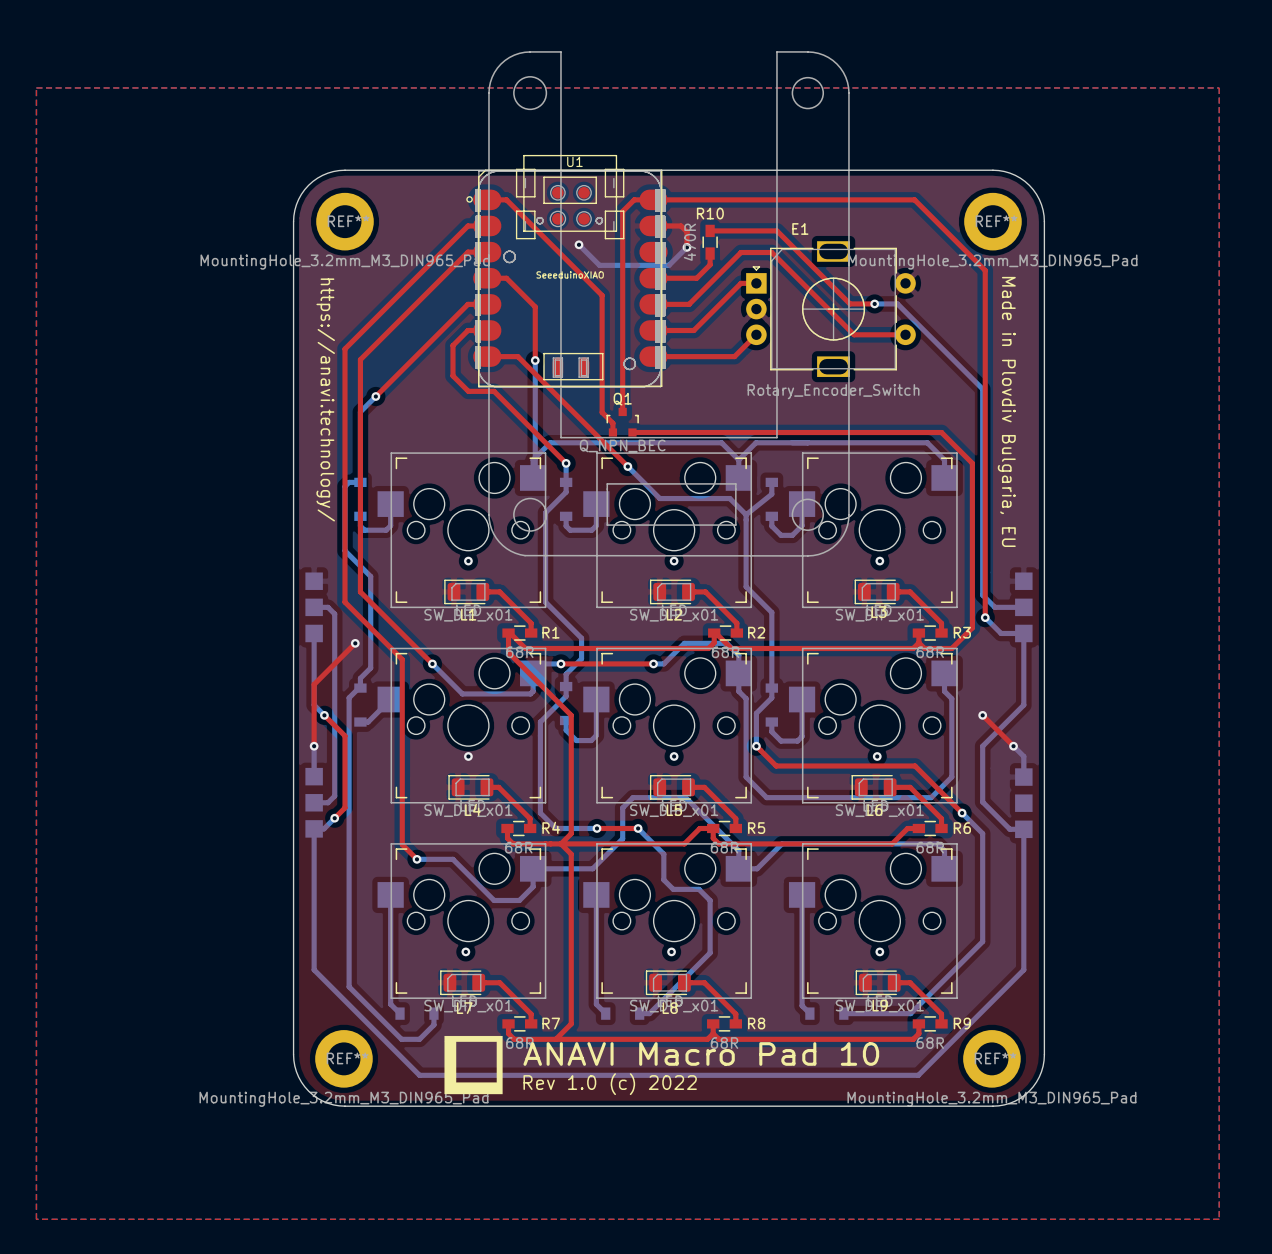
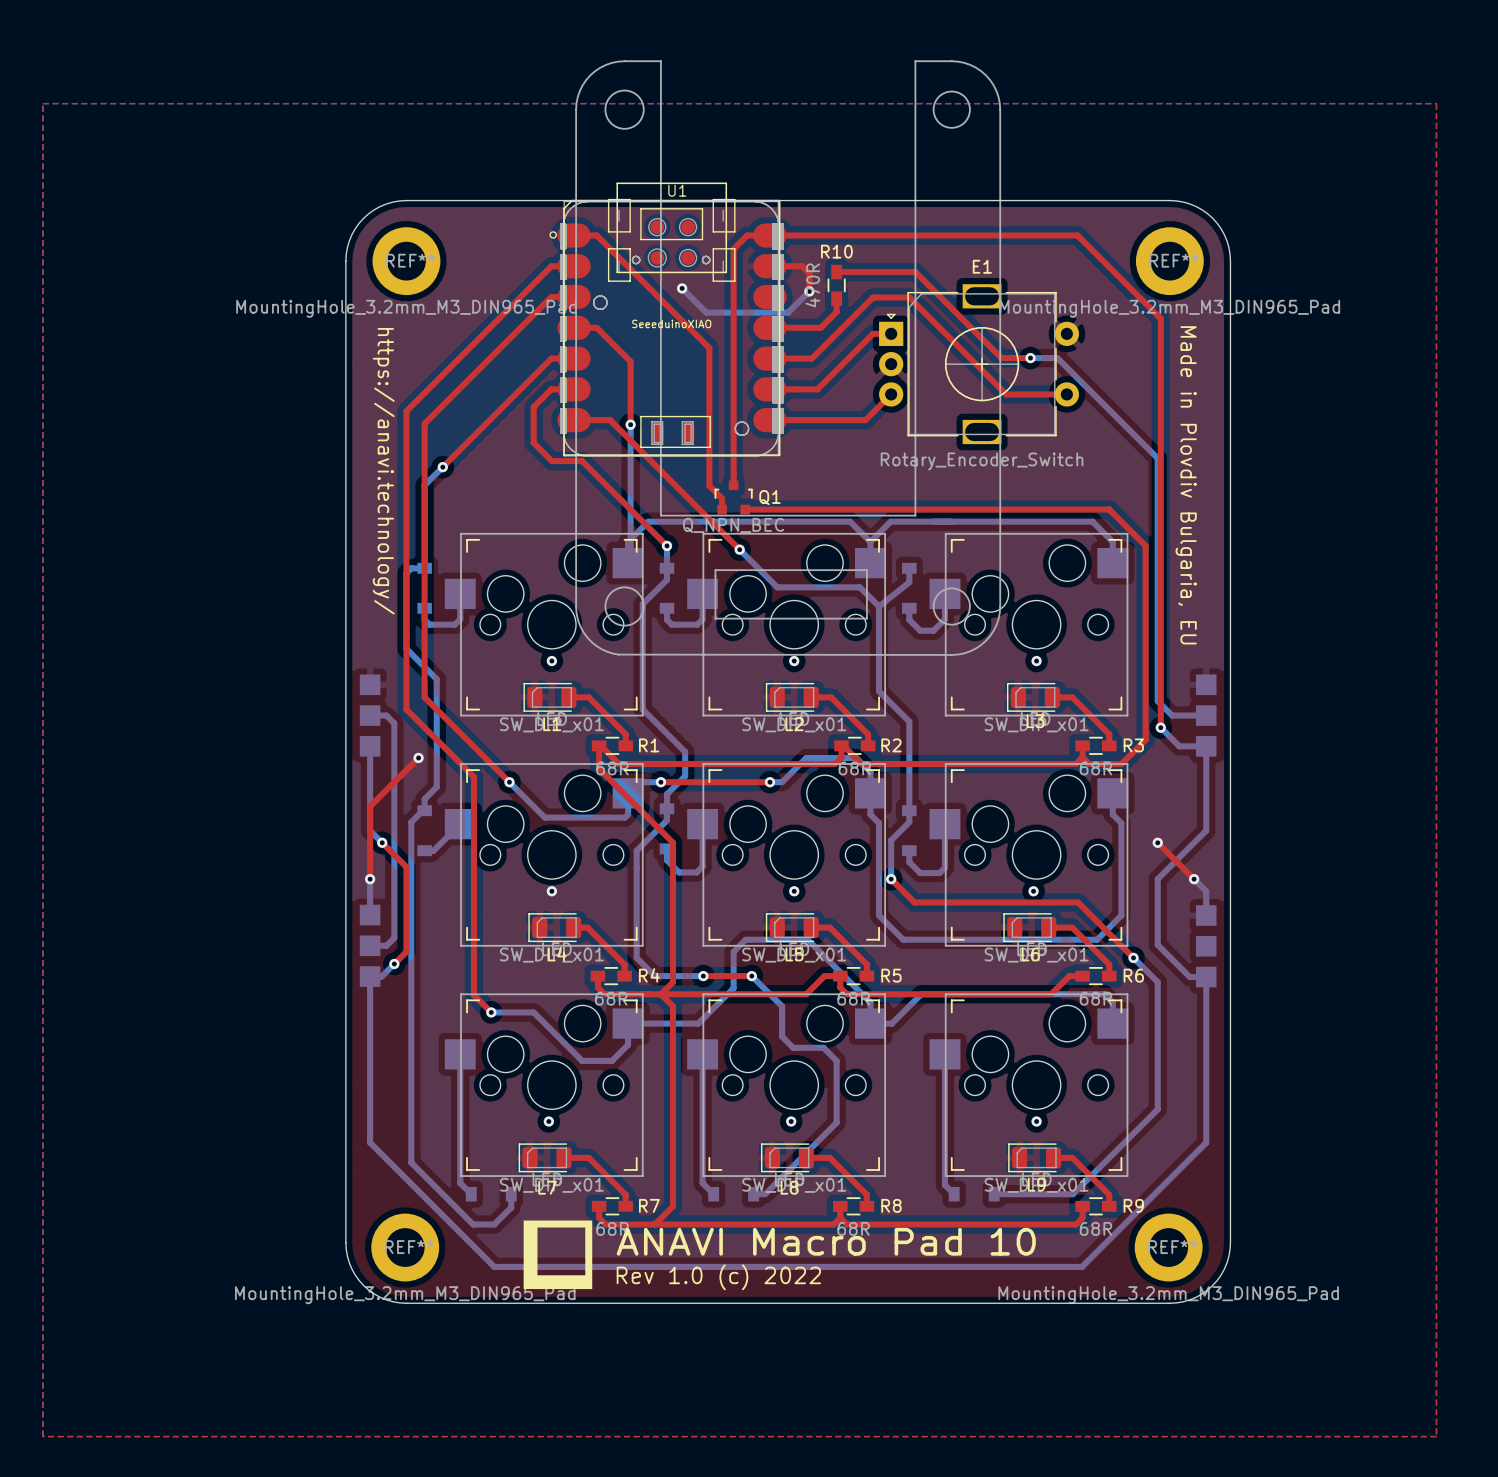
E1 name position: E1 (800, 228) -> E1 (982, 266)
Q1 name position: Q1 (622, 399) -> Q1 (769, 497)

